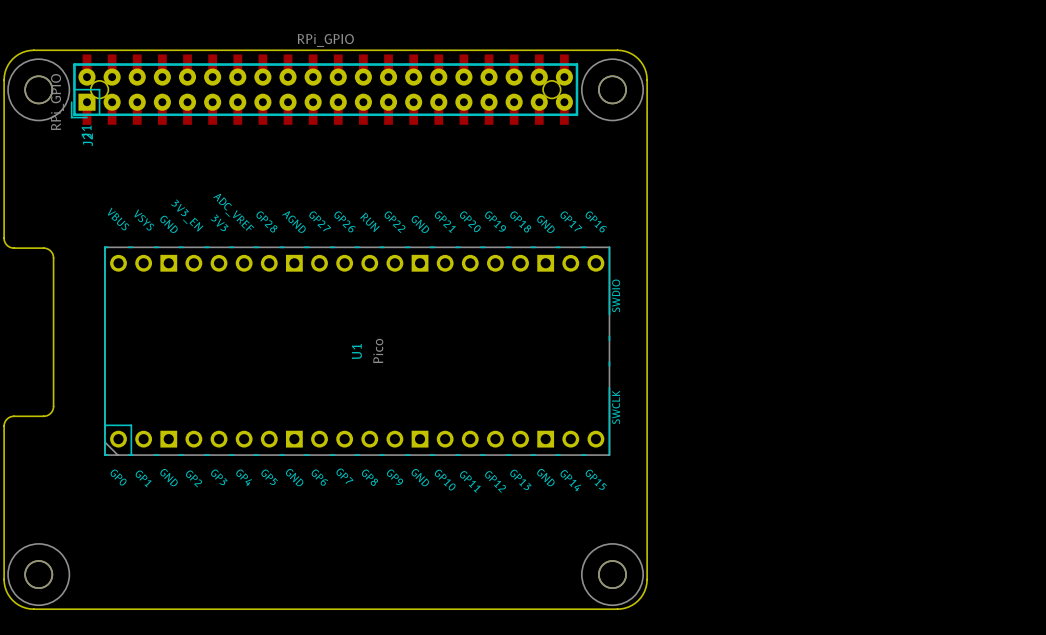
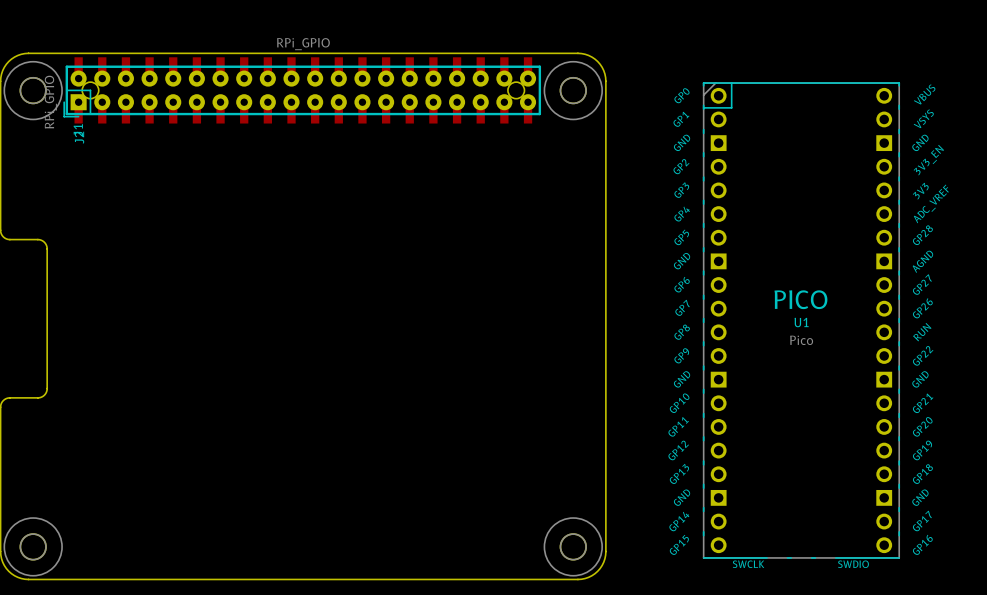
U1 footprint: [104, 246, 611, 456] -> [703, 82, 900, 559]
U1 value position: Pico (378, 351) -> Pico (801, 340)

